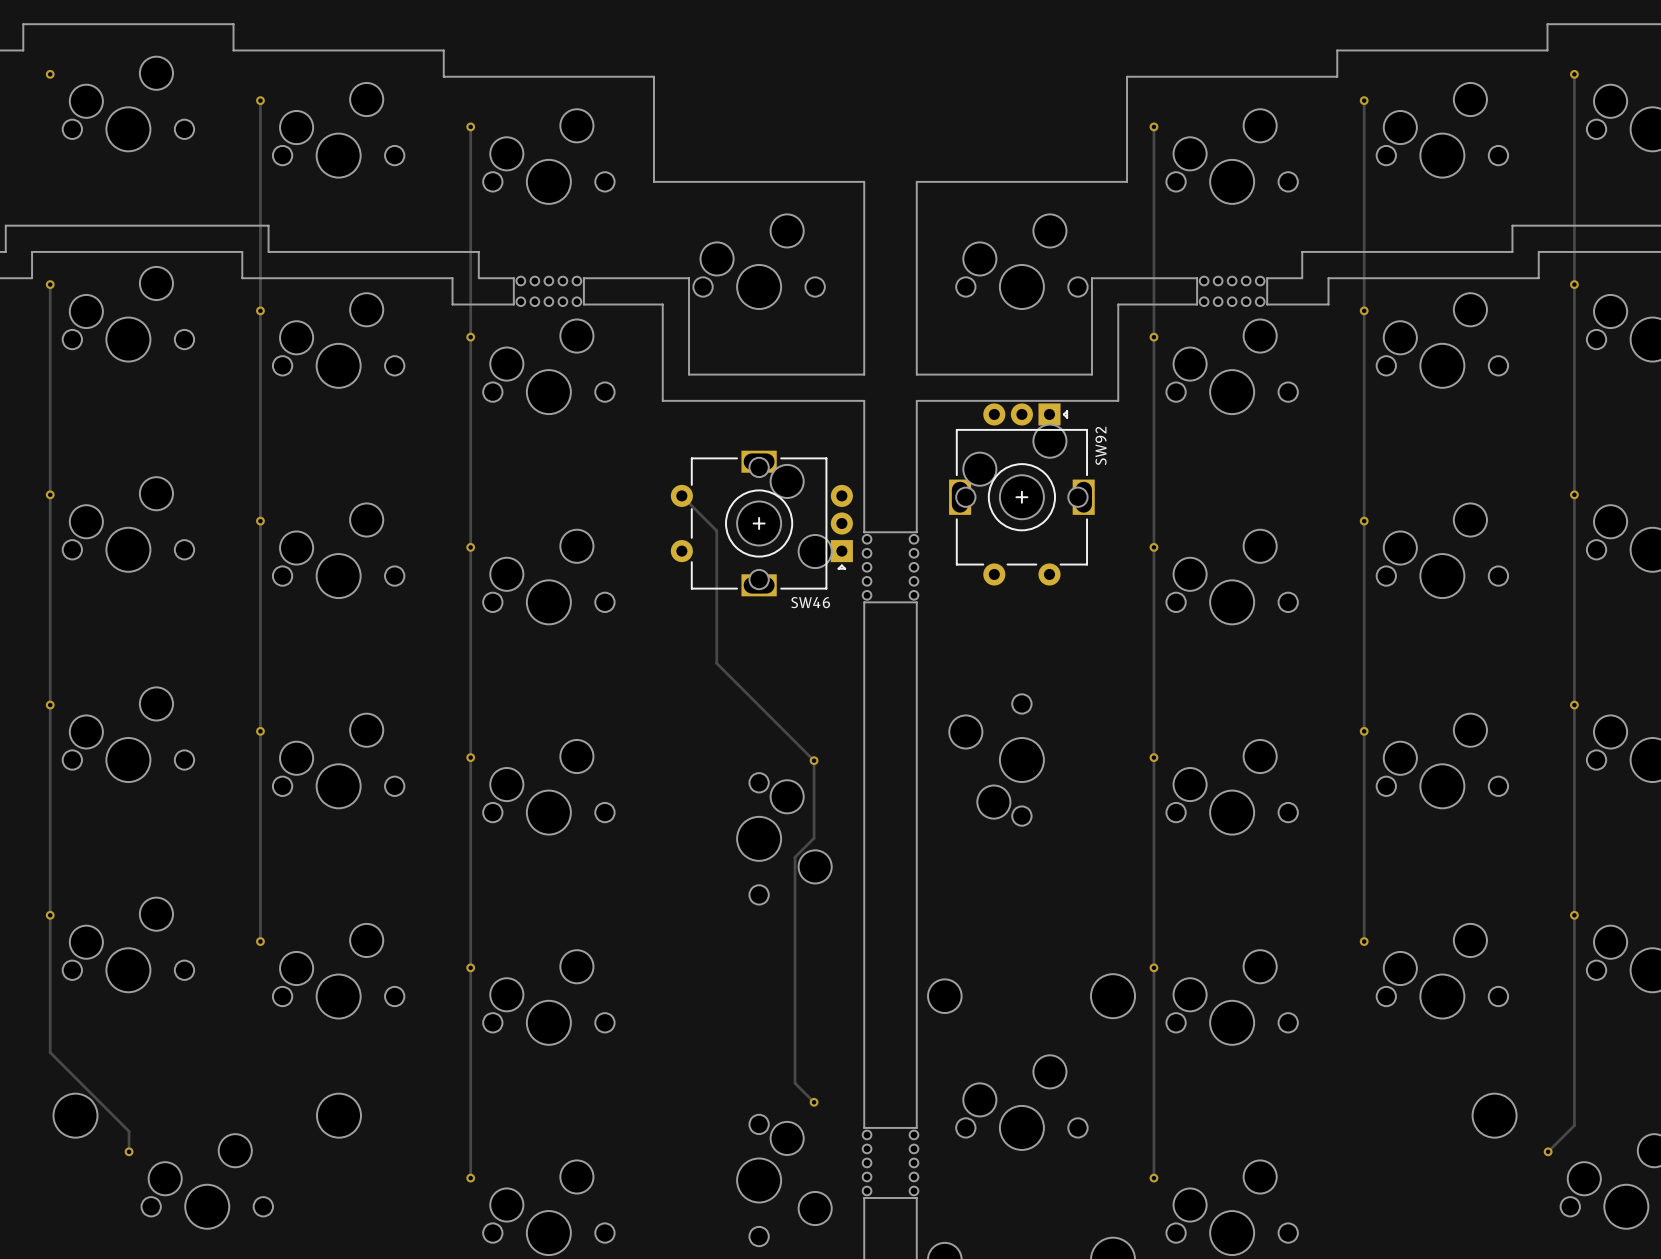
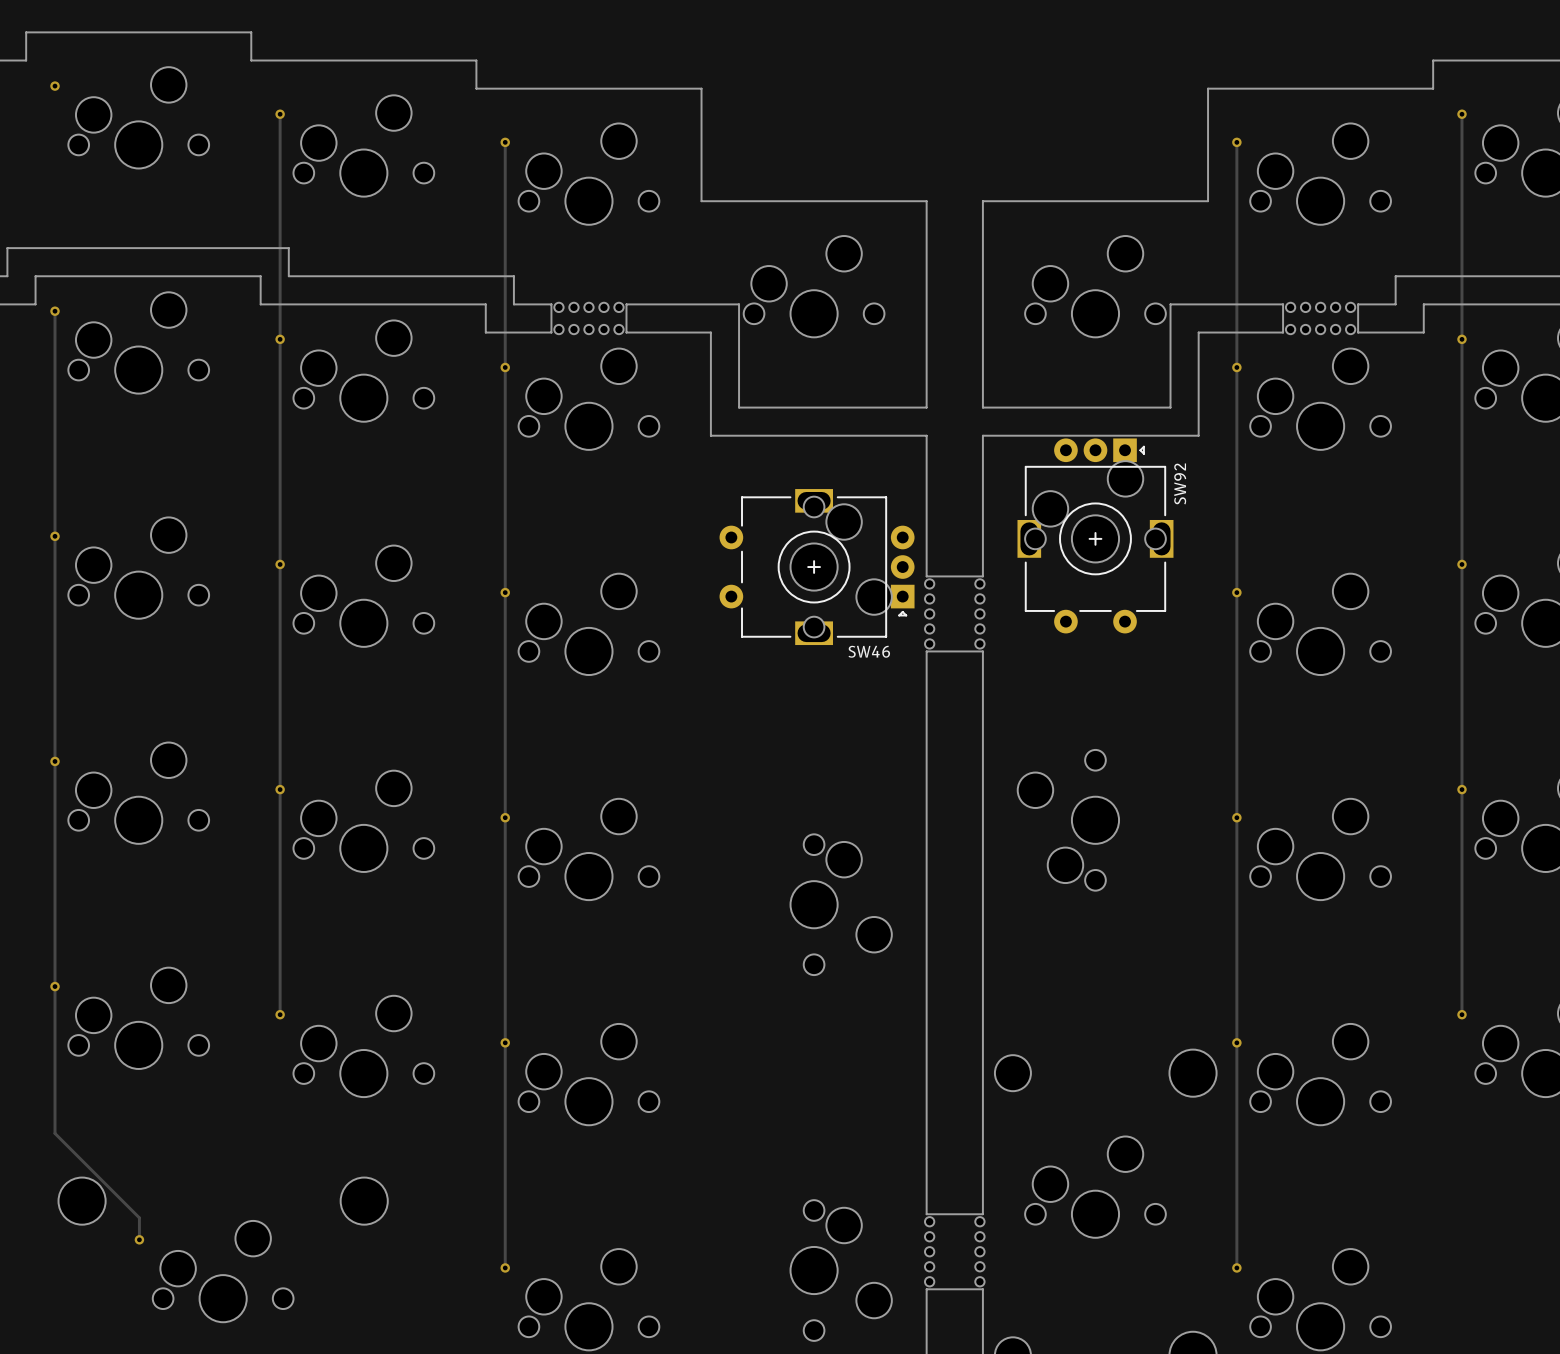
track: (681, 495) (716, 530) (716, 663) (814, 760) (814, 838) (795, 857) (795, 1083) (814, 1102) -> none
via: (814, 760) -> none
via: (814, 1102) -> none

